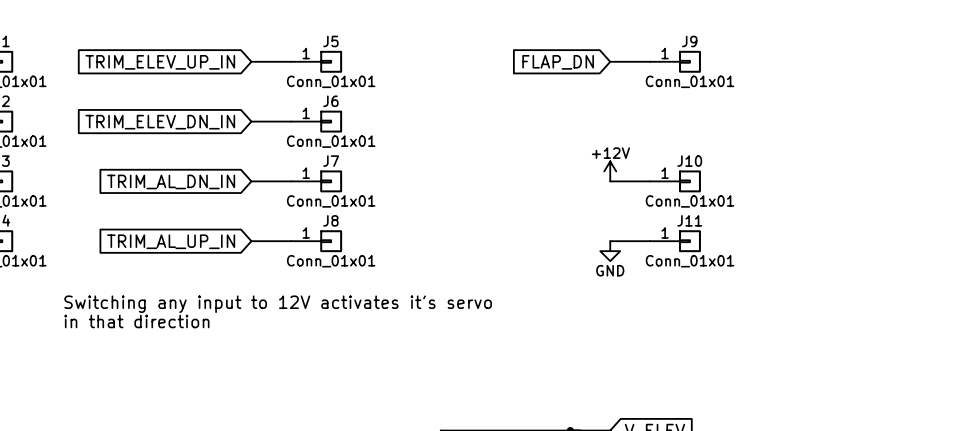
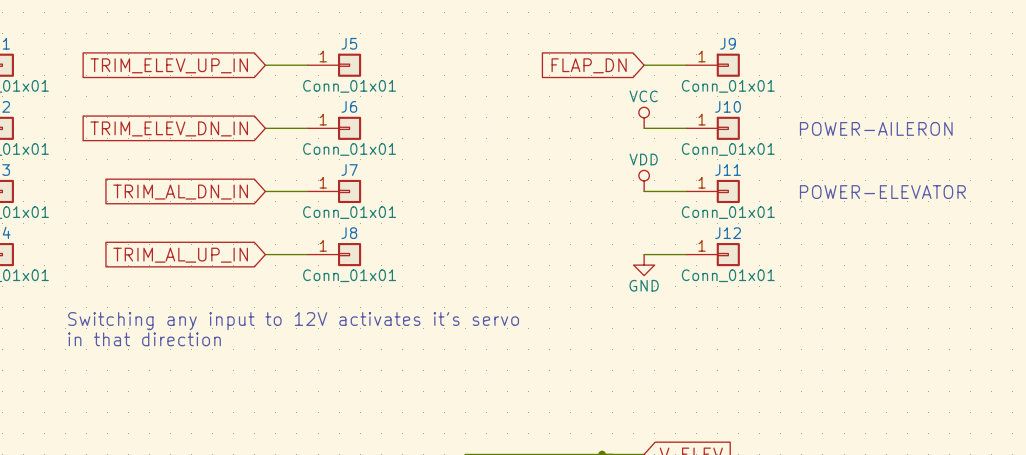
power symbol: none -> VCC (644, 117)
wire: none -> (644, 128) (686, 128)
J10: none -> Conn_01x01 (713, 128)
text: none -> POWER-AILERON (876, 128)
J10 name: J10 (689, 161) -> J11 (728, 170)
power symbol: +12V (610, 171) -> VDD (644, 180)
text: none -> POWER-ELEVATOR (882, 192)
J11 name: J11 (689, 220) -> J12 (728, 233)

